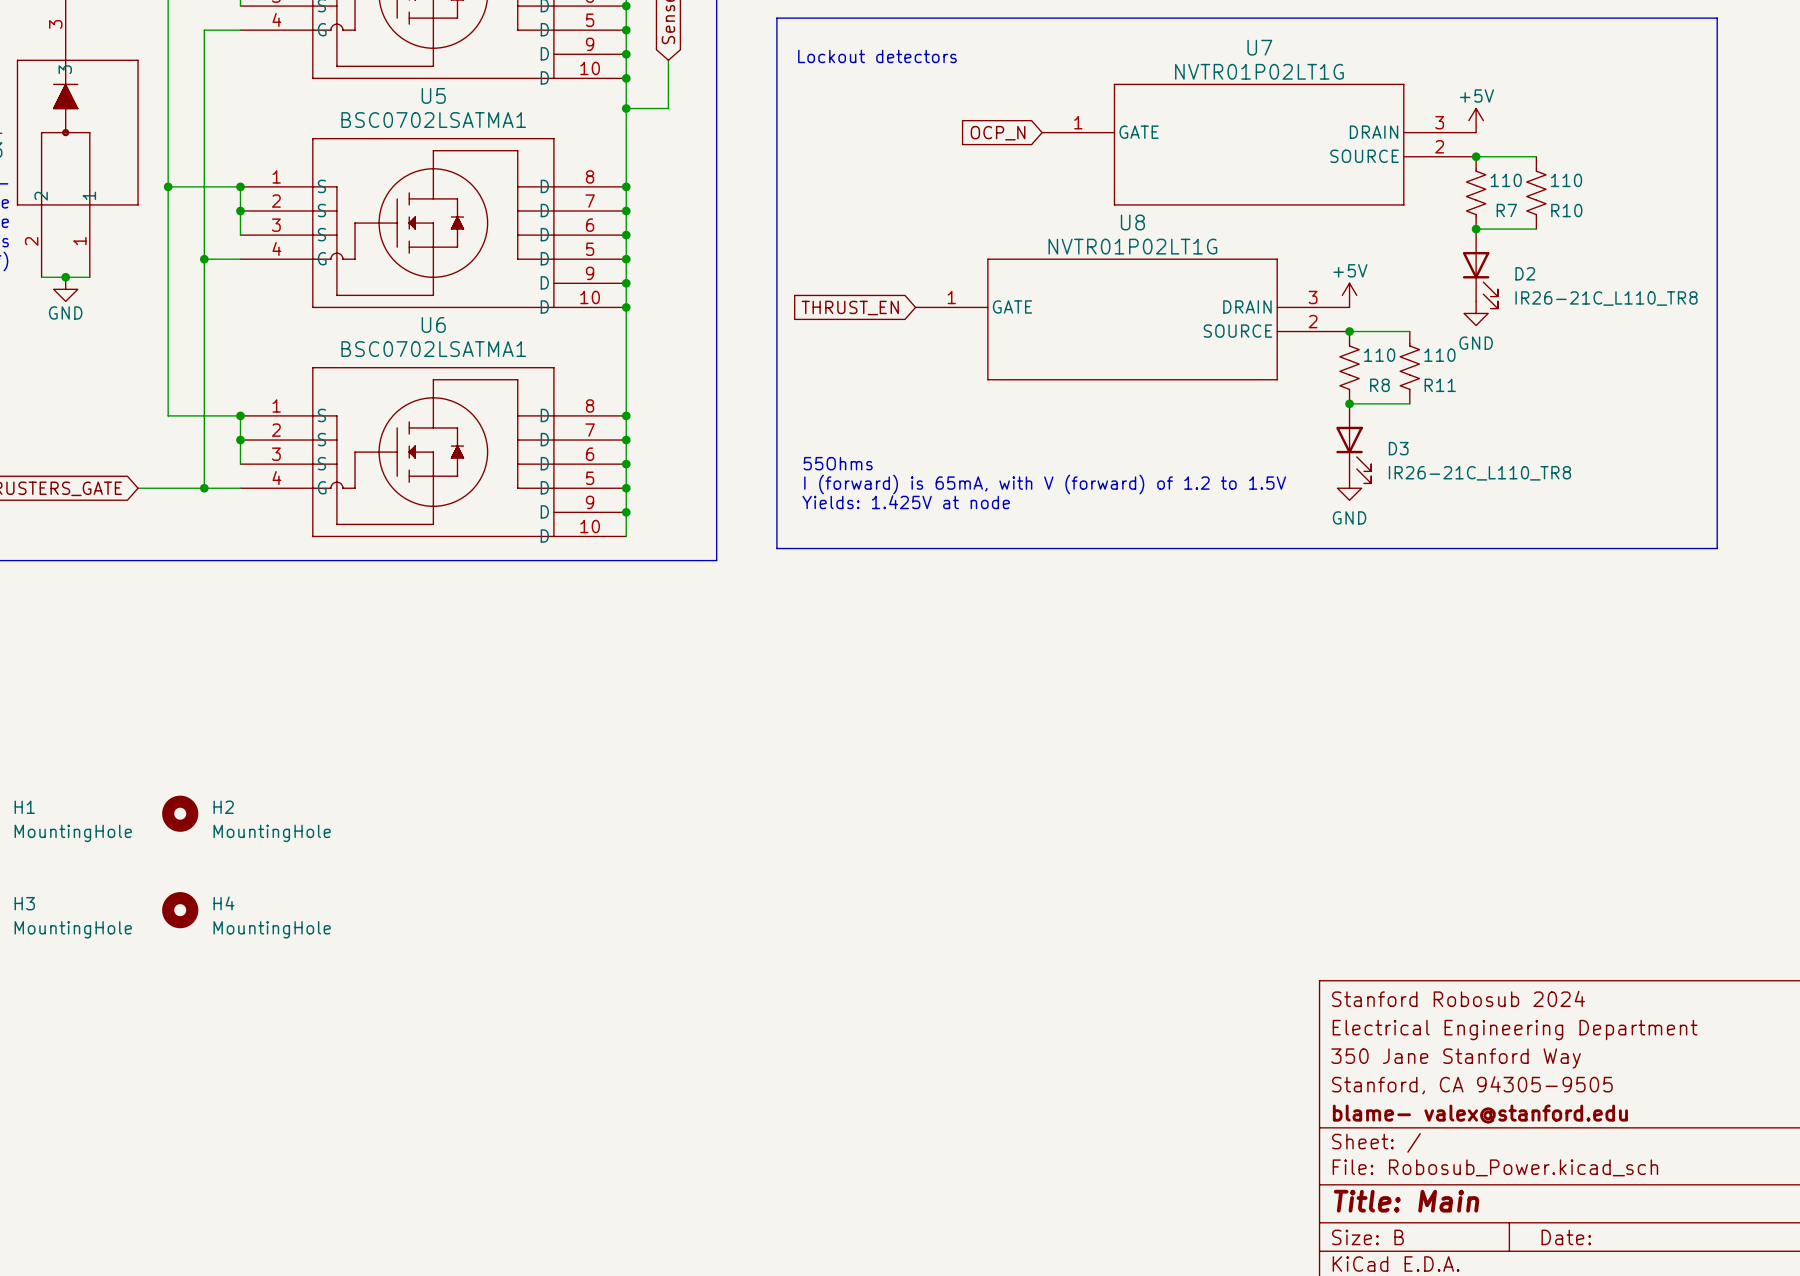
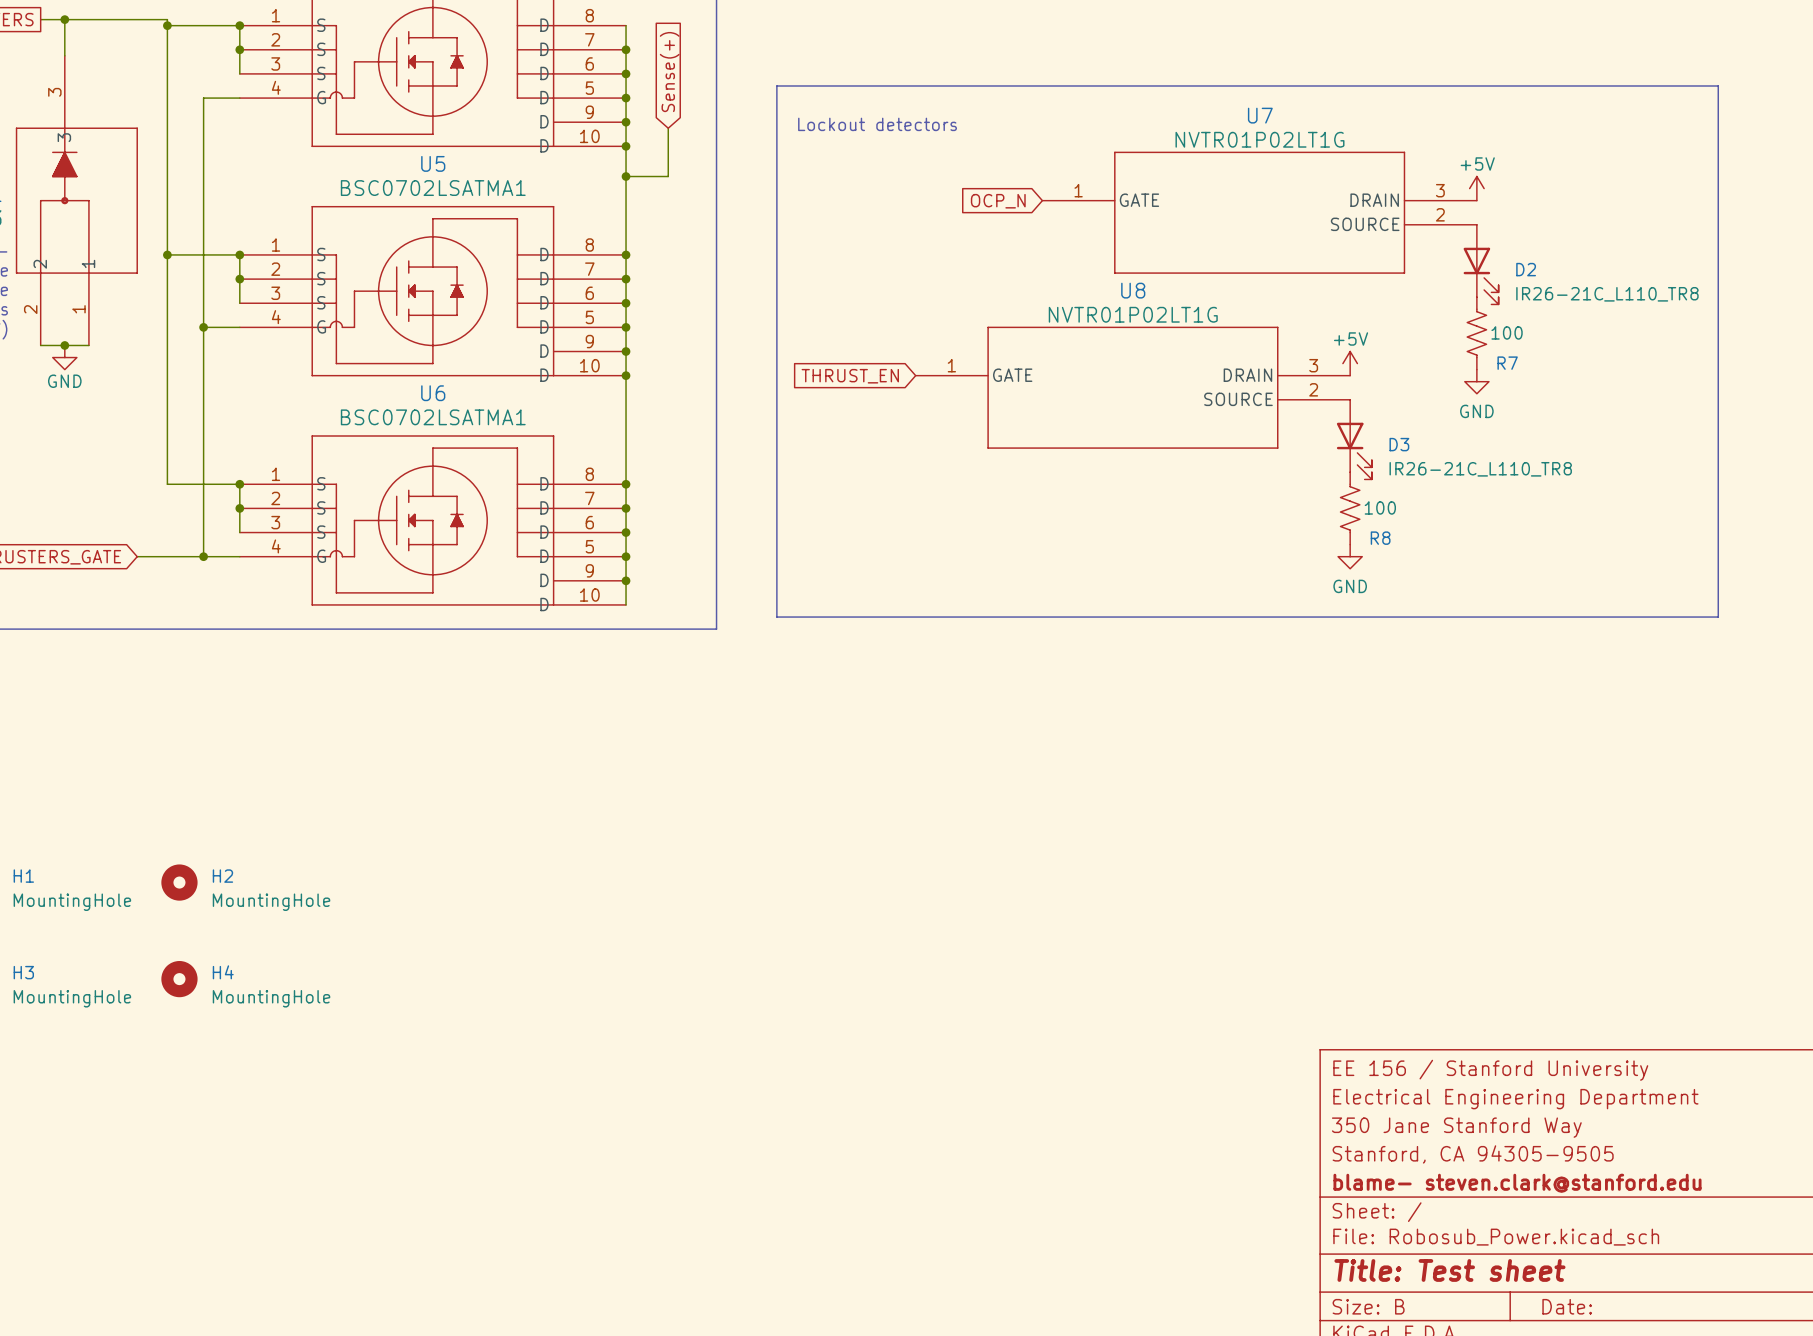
wire: (1476, 156) (1536, 156) -> none
junction: (1476, 156) -> none
R7 value: 110 (1506, 180) -> 100 (1507, 332)
R7 position: (1476, 192) -> (1476, 333)
R10: 110 (1536, 192) -> none
R7 name position: R7 (1506, 210) -> R7 (1507, 363)
wire: (1476, 229) (1536, 229) -> none
junction: (1476, 229) -> none
D2 position: (1480, 268) -> (1481, 264)
wire: (1349, 331) (1409, 331) -> none
junction: (1349, 331) -> none
R8 value: 110 (1379, 355) -> 100 (1380, 507)
R8 position: (1349, 367) -> (1350, 508)
R11: 110 (1409, 367) -> none
R8 name position: R8 (1379, 385) -> R8 (1380, 538)
wire: (1349, 403) (1409, 403) -> none
junction: (1349, 403) -> none
D3 position: (1353, 443) -> (1354, 439)
text: 55Ohms (838, 463) -> none
text: I (forward) is 65mA, with V (forward) of 1.2 to 1.5V (1045, 484) -> none
text: Yields: 1.425V at node (906, 502) -> none
title block: Stanford Robosub 2024 (1458, 998) -> EE 156 / Stanford University (1490, 1070)
title block: blame- valex@stanford.edu (1480, 1114) -> blame- steven.clark@stanford.edu (1517, 1183)
title block: Title: Main (1406, 1201) -> Title: Test sheet (1449, 1270)

